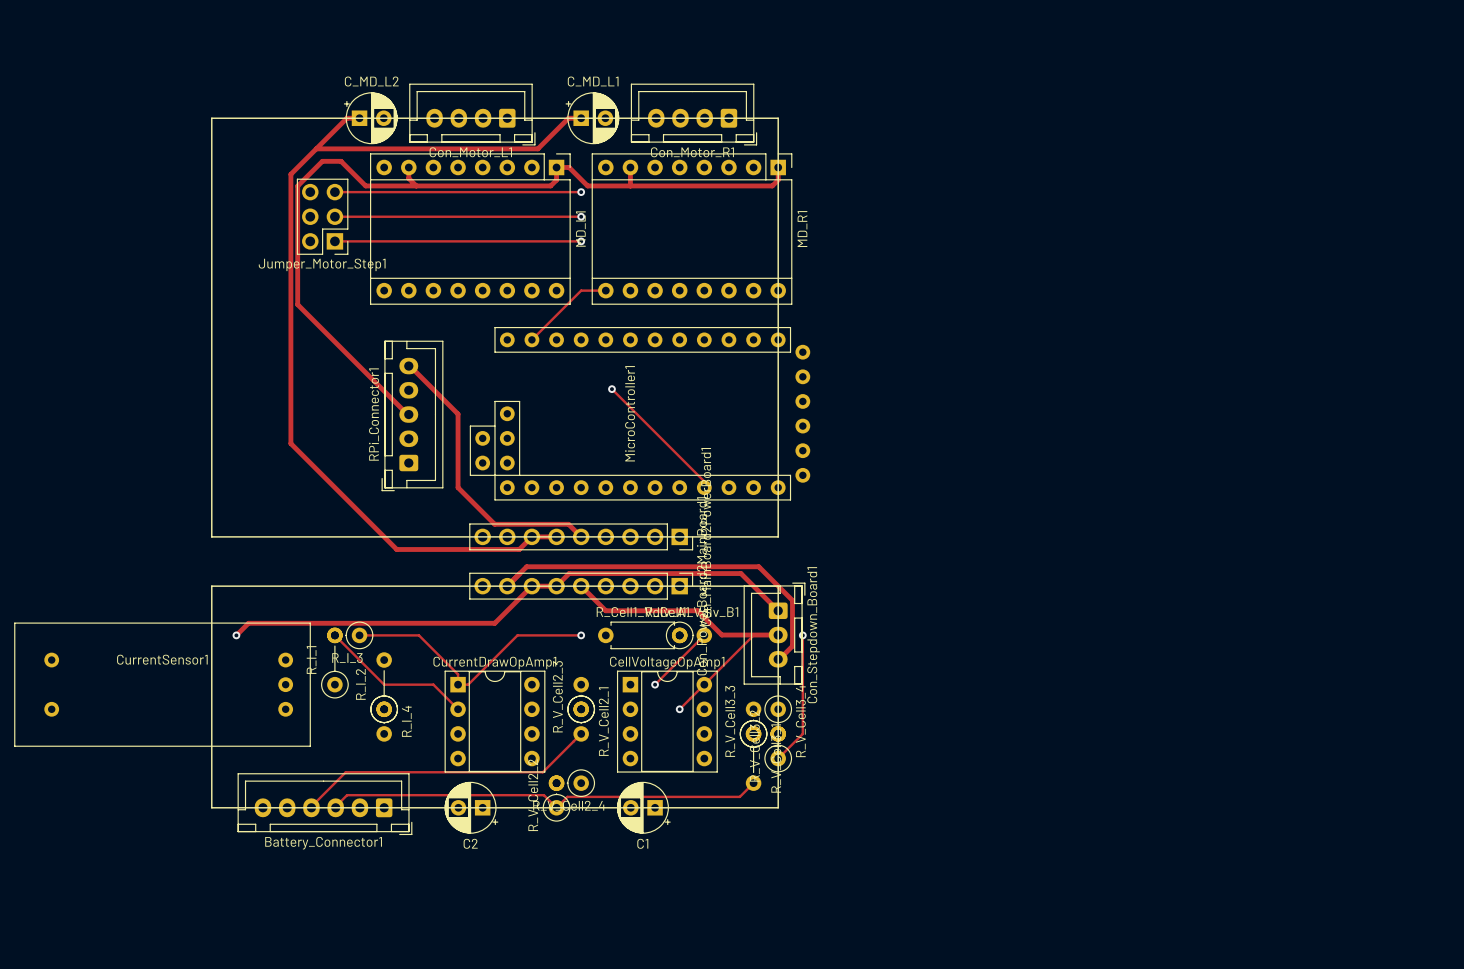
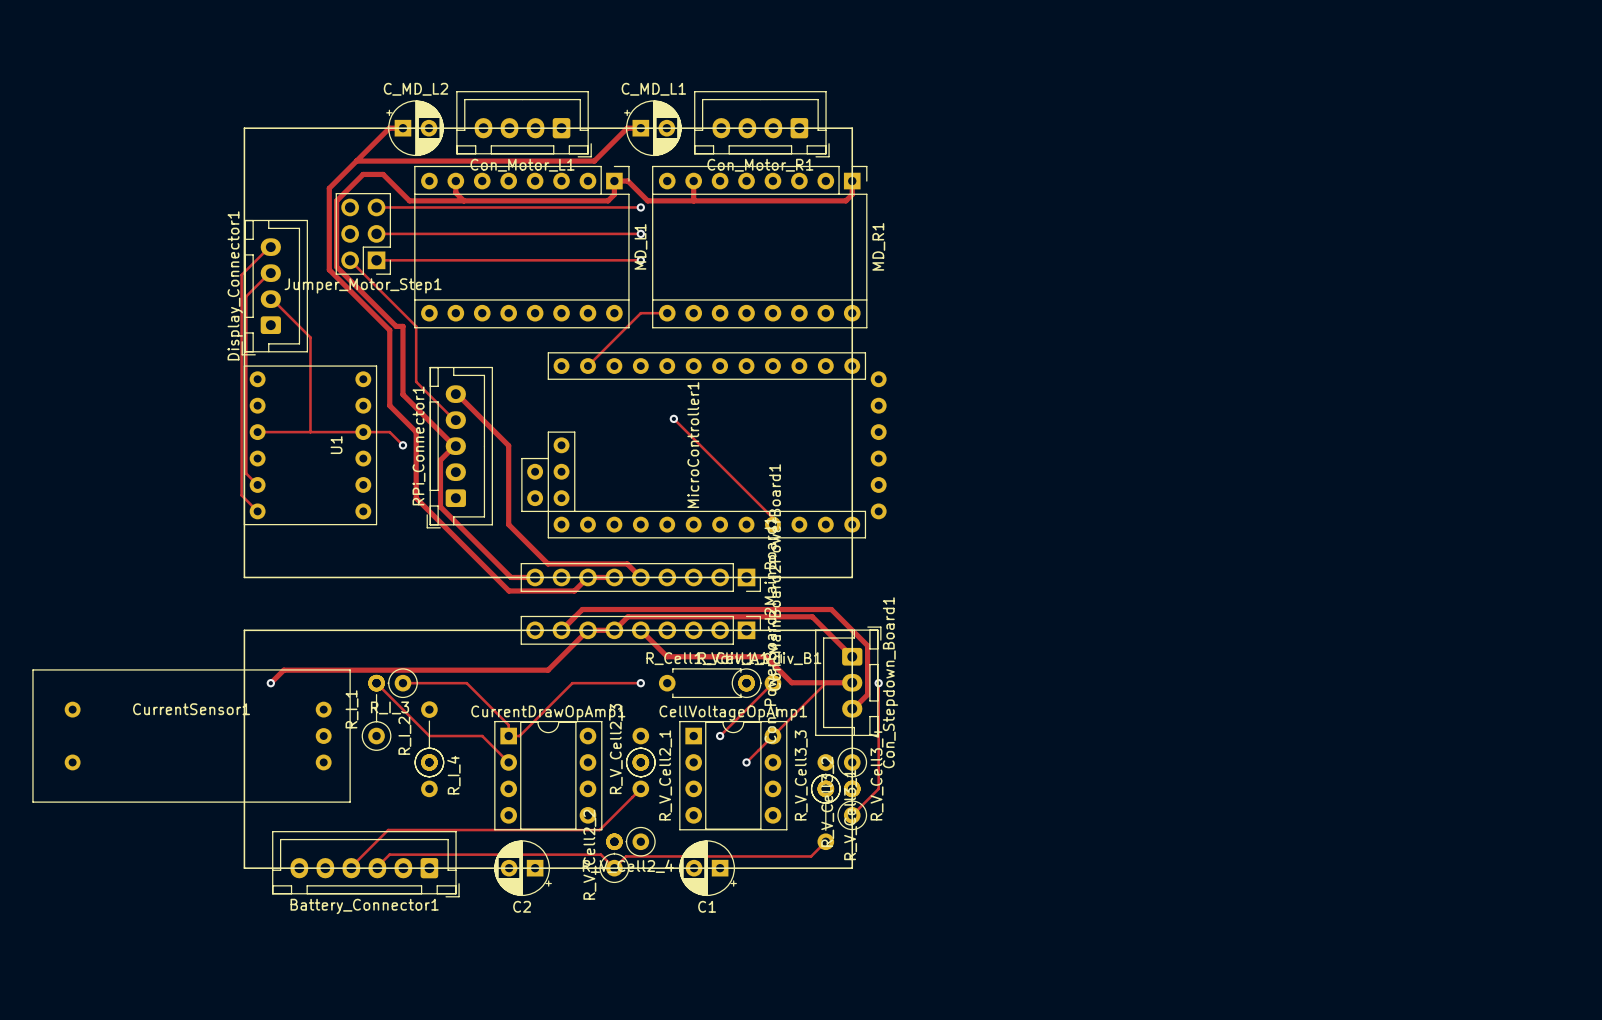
track: none -> (270, 247) (241, 275) (241, 495) (257, 511)
track: none -> (350, 260) (416, 326) (416, 381) (455, 420)
track: (297, 247) (297, 304) (359, 366) -> (336, 266) (396, 326) (402, 326) (402, 394)
track: (290, 250) (290, 443) (396, 549) (458, 549) -> (329, 269) (389, 330) (389, 405) (416, 432) (416, 498) (509, 590)
track: none -> (270, 273) (246, 296) (246, 473) (257, 484)
Display_Connector1: none -> (274, 287)
track: none -> (270, 299) (310, 337) (310, 432)
track: none -> (257, 432) (389, 432) (402, 445)
U1: none -> (310, 445)
via: none -> (402, 445)
track: none -> (454, 446) (440, 460) (440, 506) (511, 577) (535, 577)

